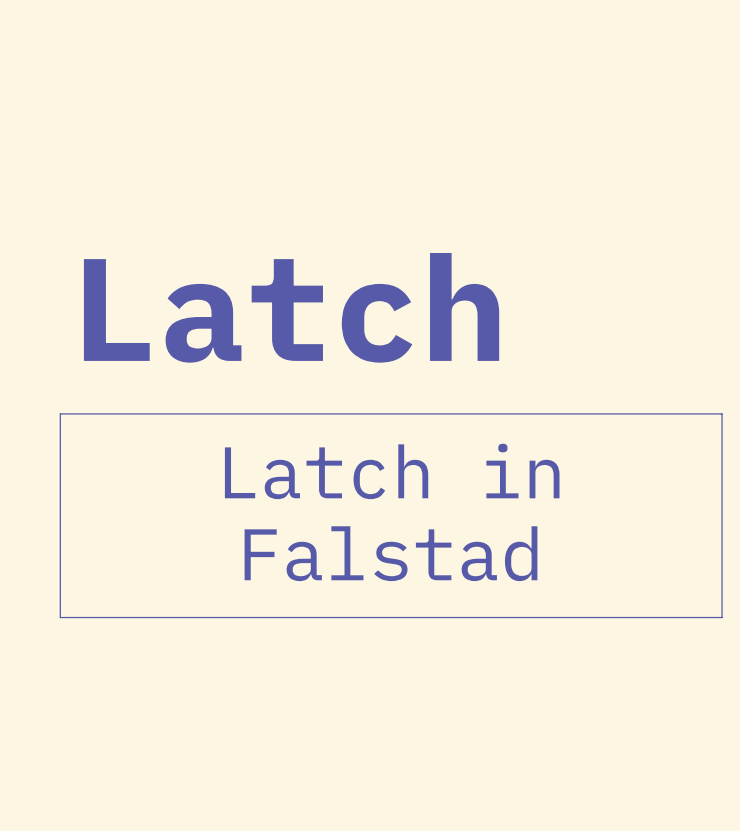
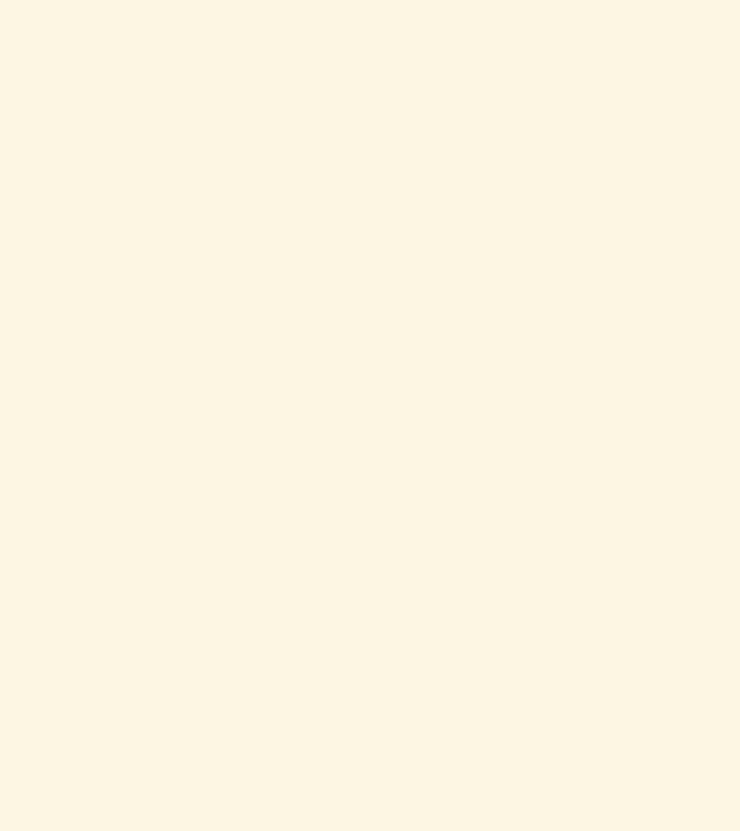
text: Latch (291, 307) -> none
line: (60, 413) (722, 413) (722, 617) (60, 617) (60, 413) -> none
text: Latch in (392, 471) -> none
text: Falstad (390, 553) -> none

